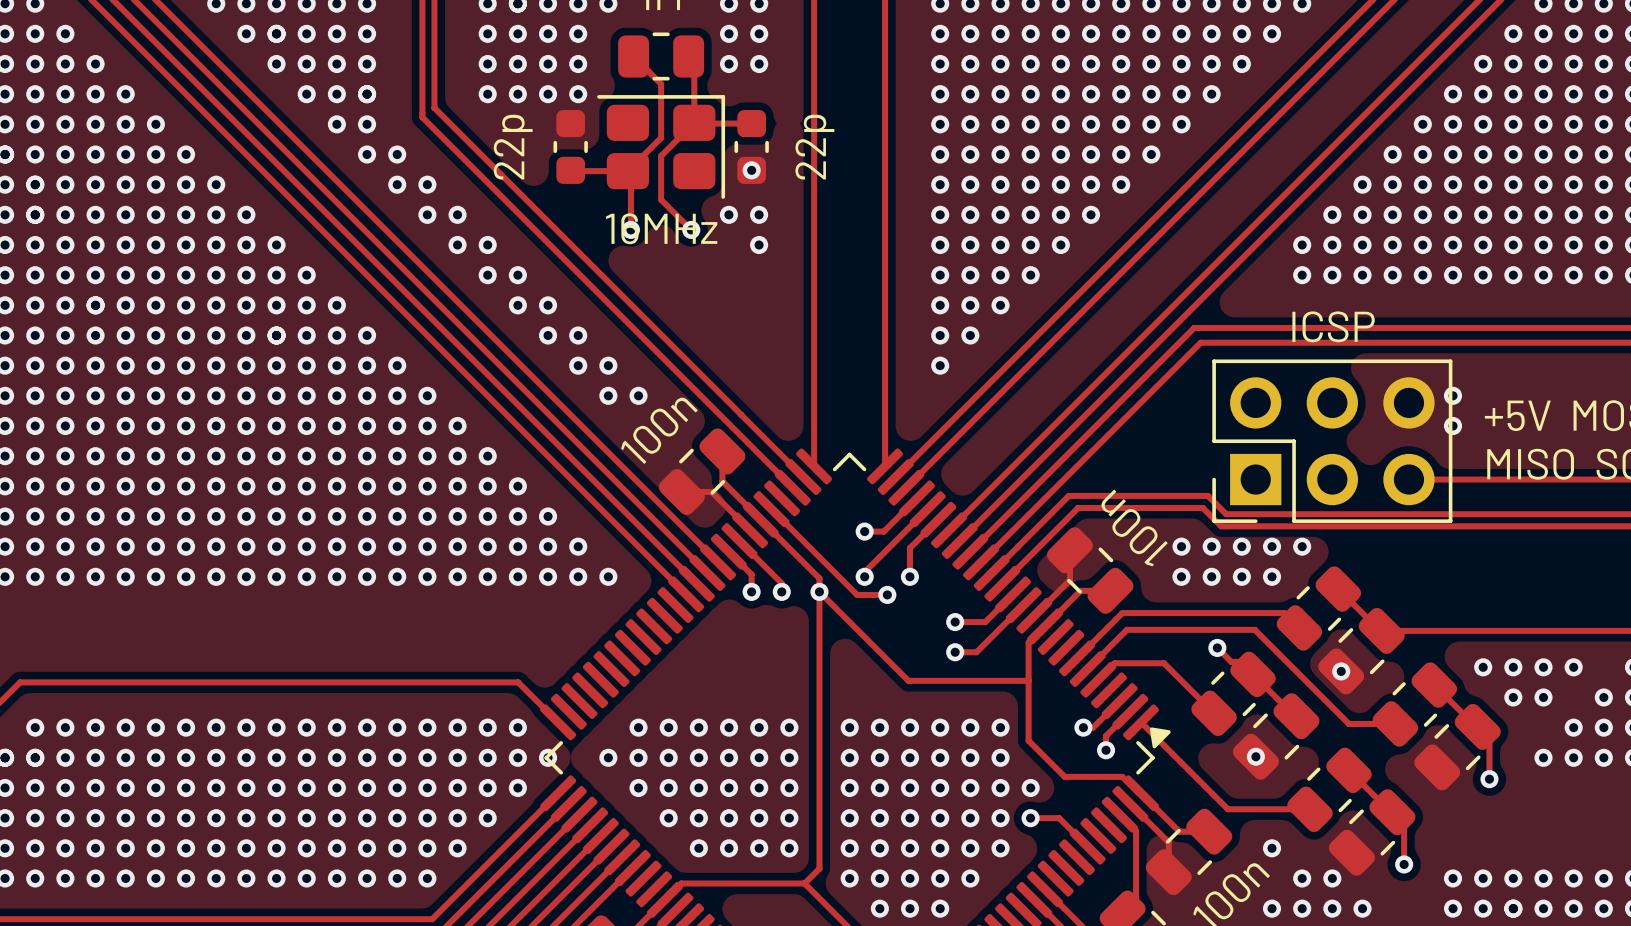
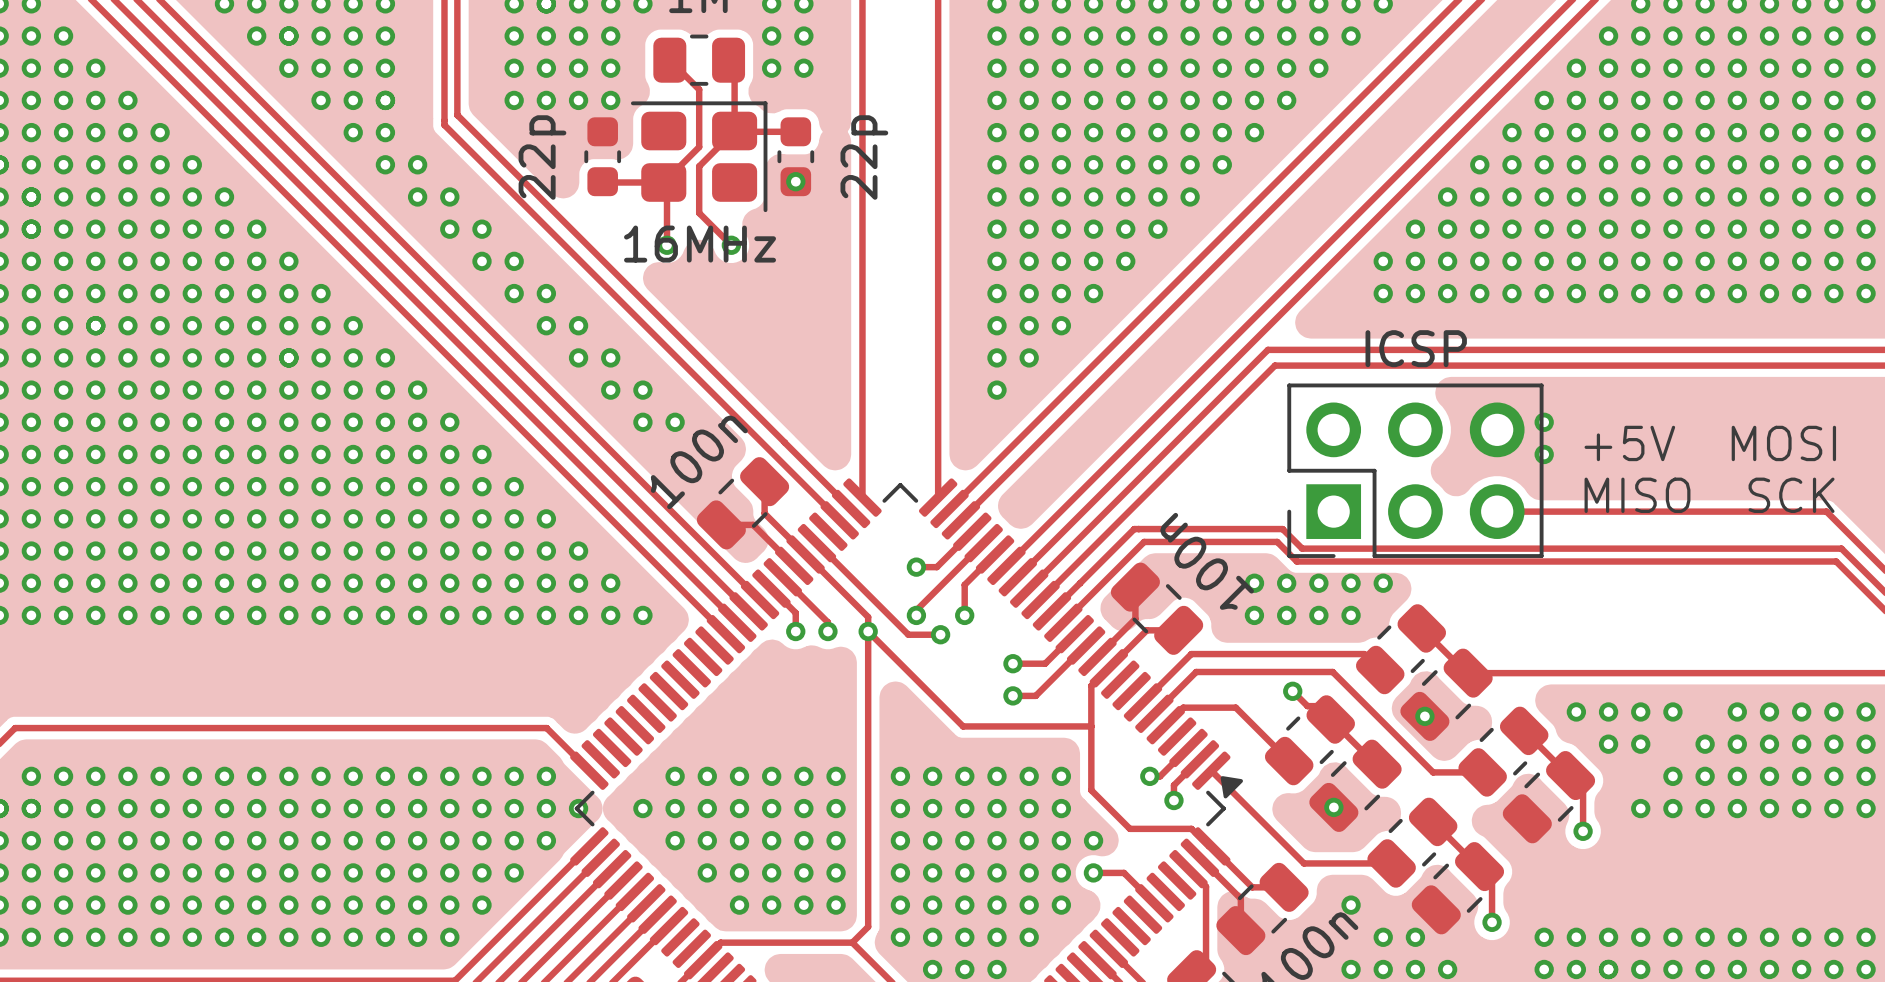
via: (728, 214) -> none
via: (759, 214) -> none
via: (759, 245) -> none

